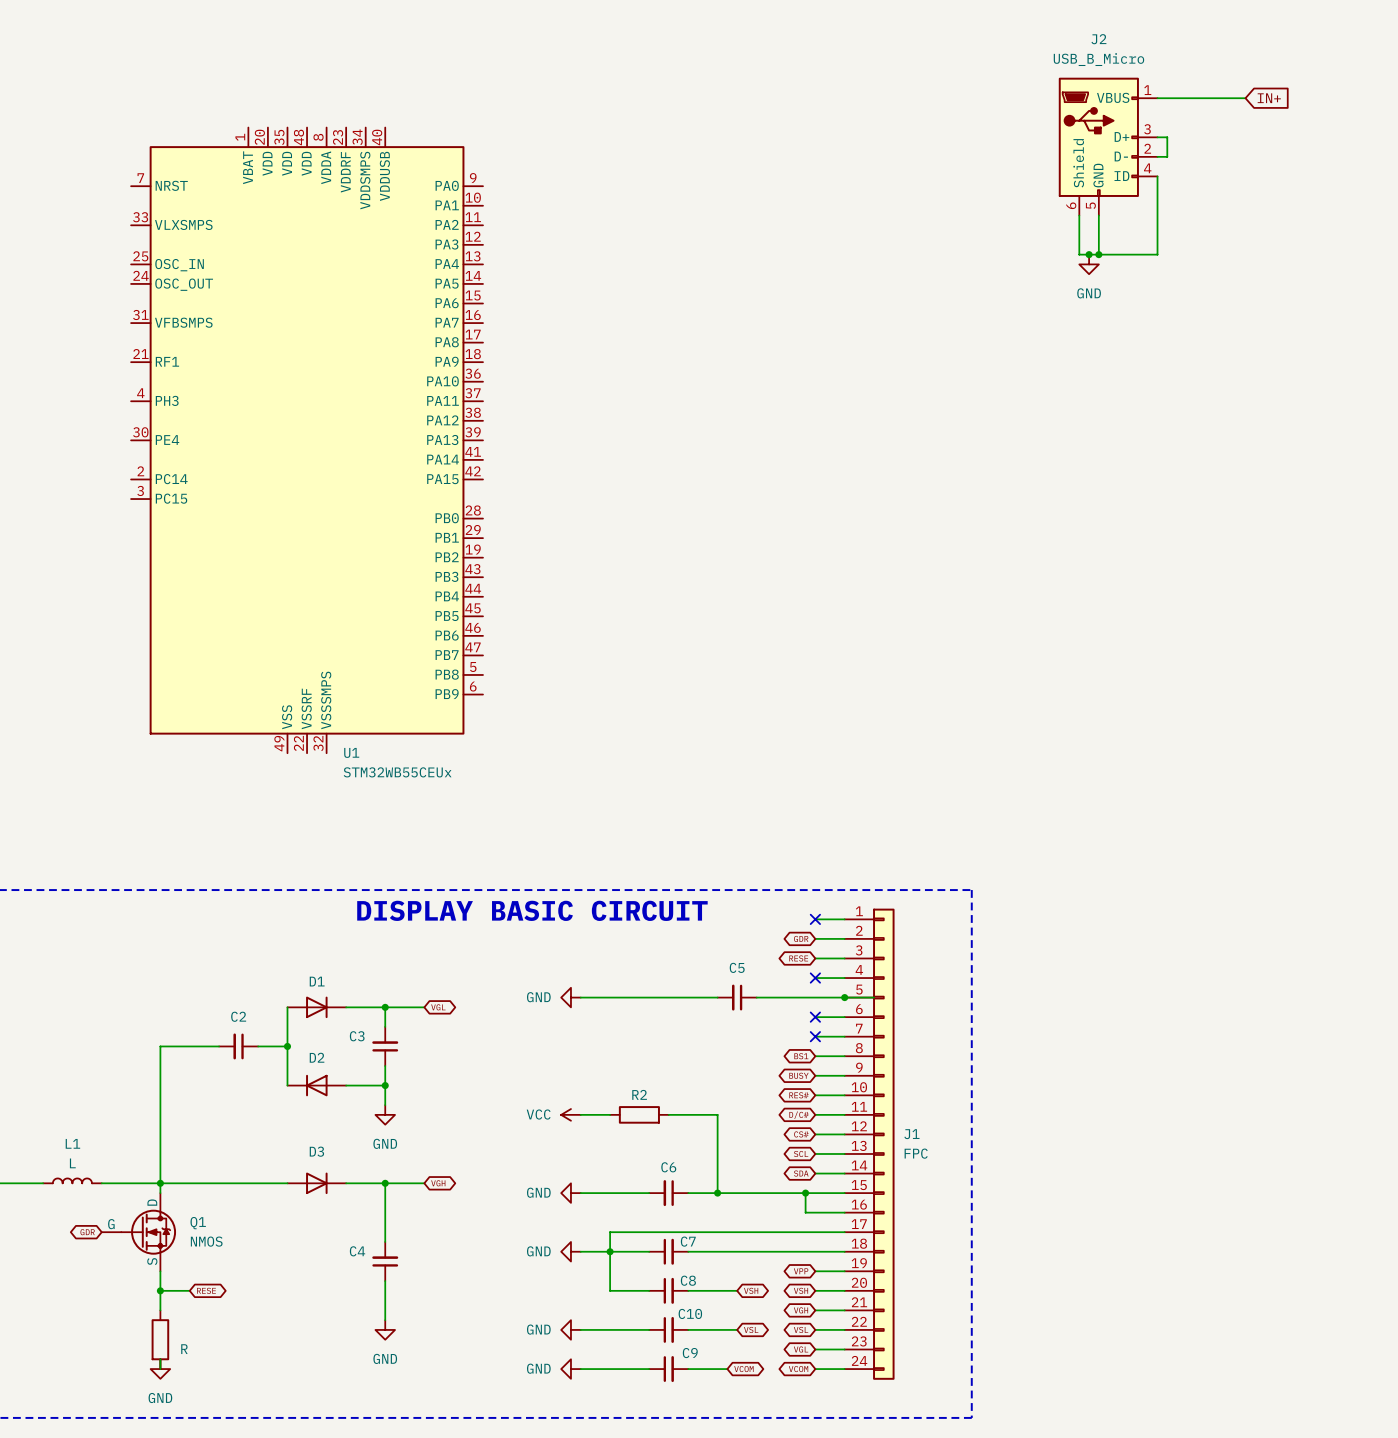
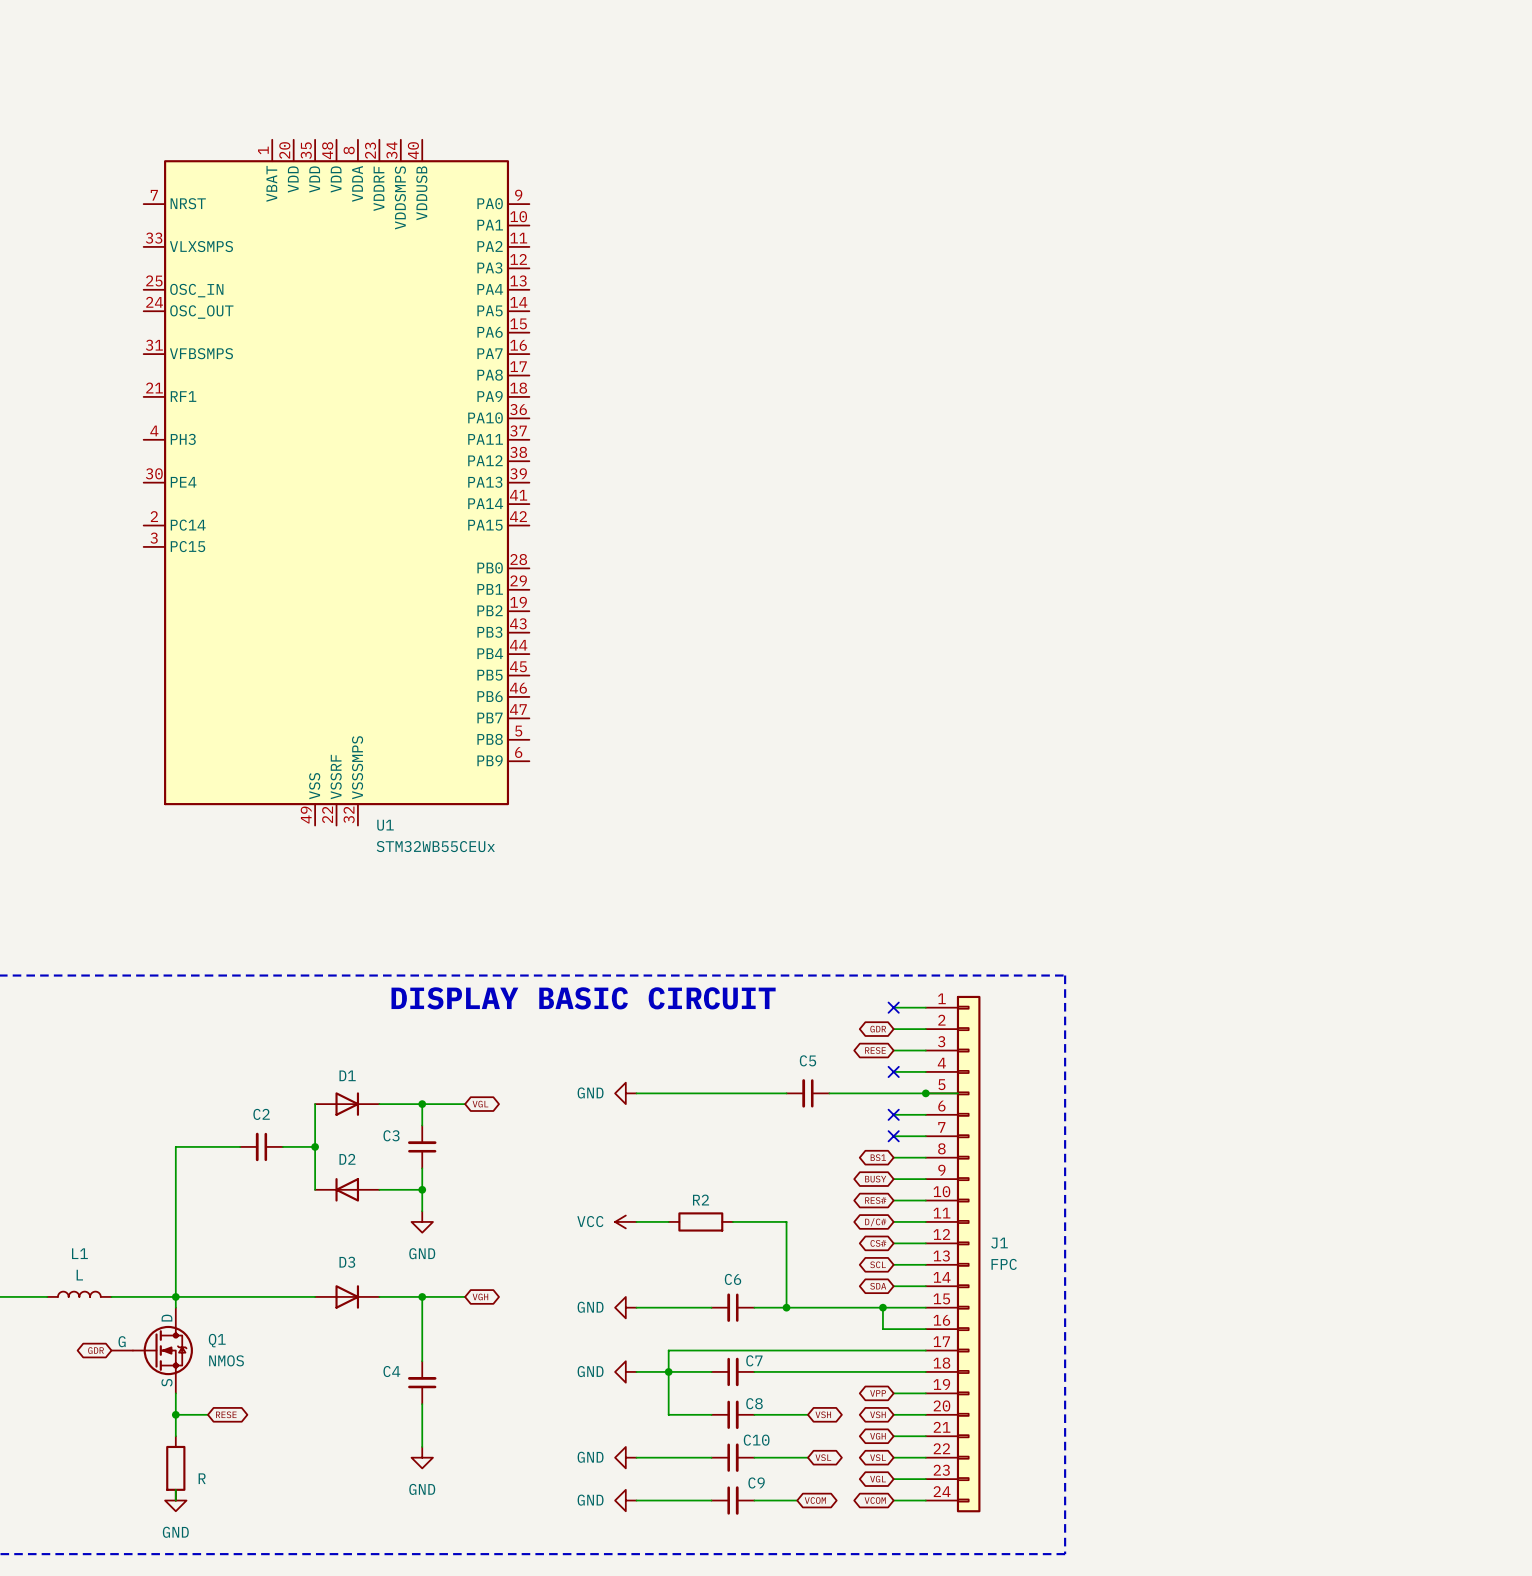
wire: (1157, 98) (1245, 98) -> none
global label: IN+ (1269, 98) -> none
wire: (1157, 137) (1167, 137) (1167, 156) (1157, 156) -> none
J2: USB_B_Micro (1108, 146) -> none
wire: (1157, 176) (1157, 254) (1079, 254) (1079, 215) -> none
wire: (1098, 215) (1098, 254) -> none
junction: (1089, 254) -> none
junction: (1098, 254) -> none
power symbol: GND (1089, 264) -> none

